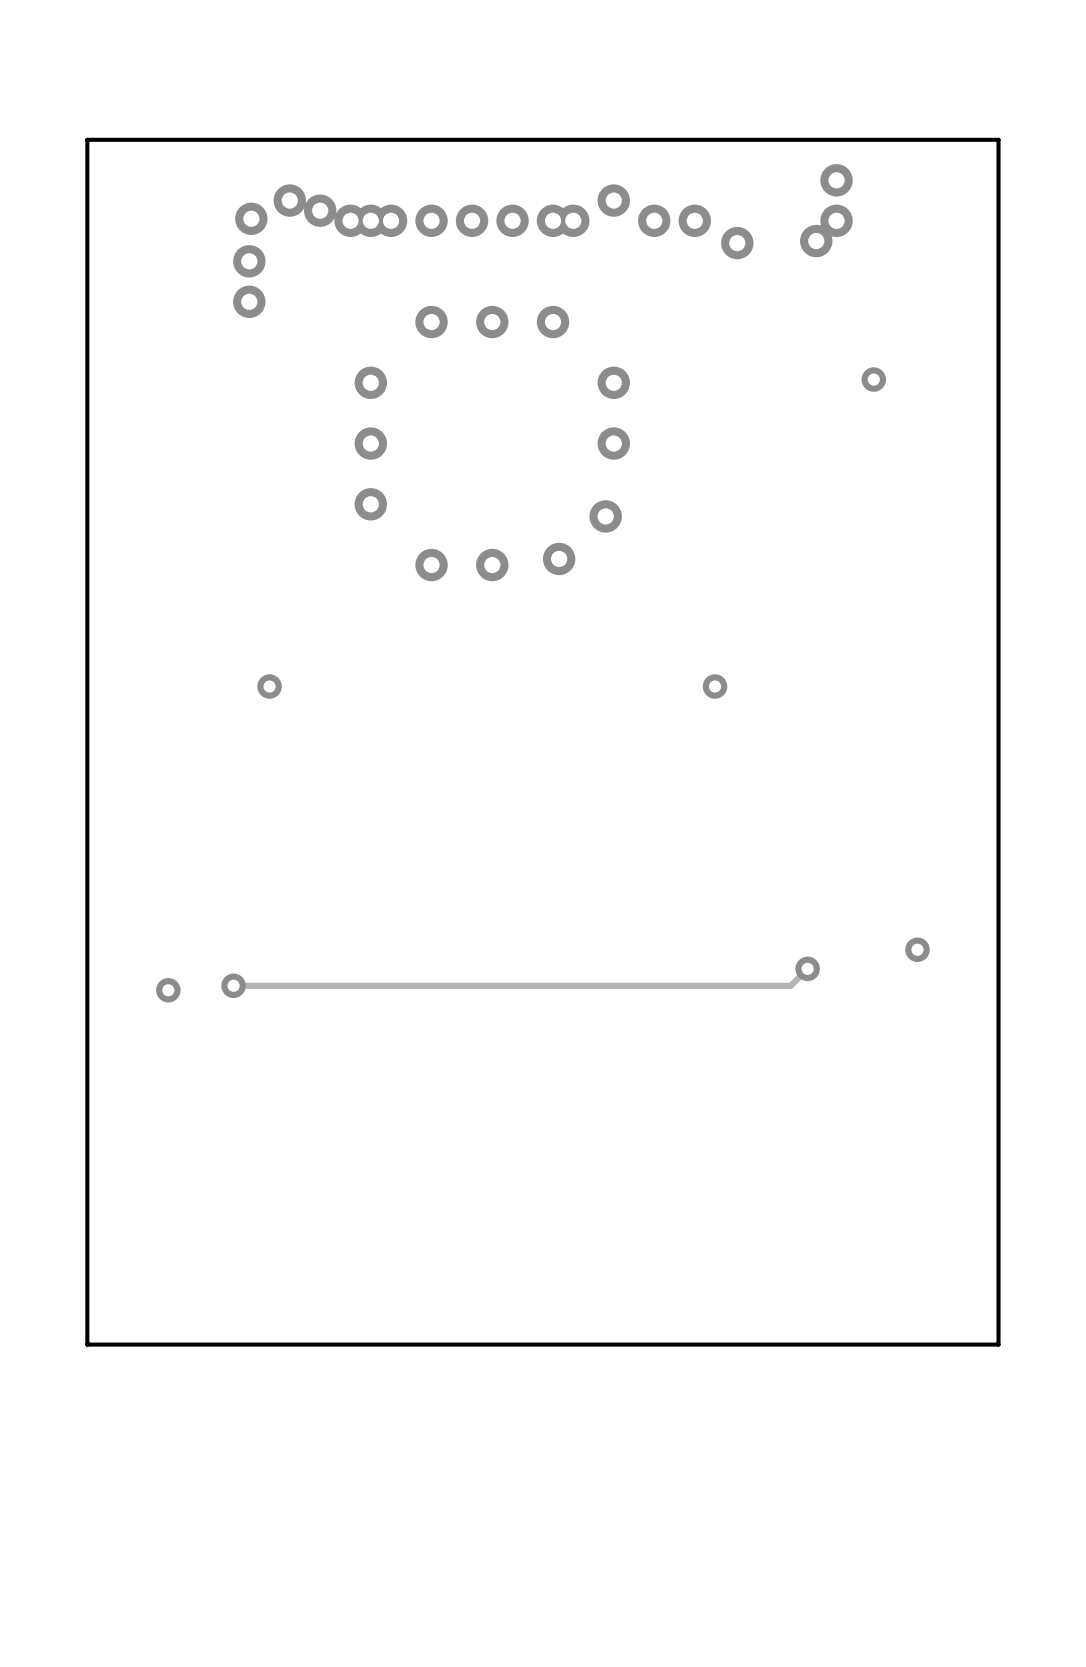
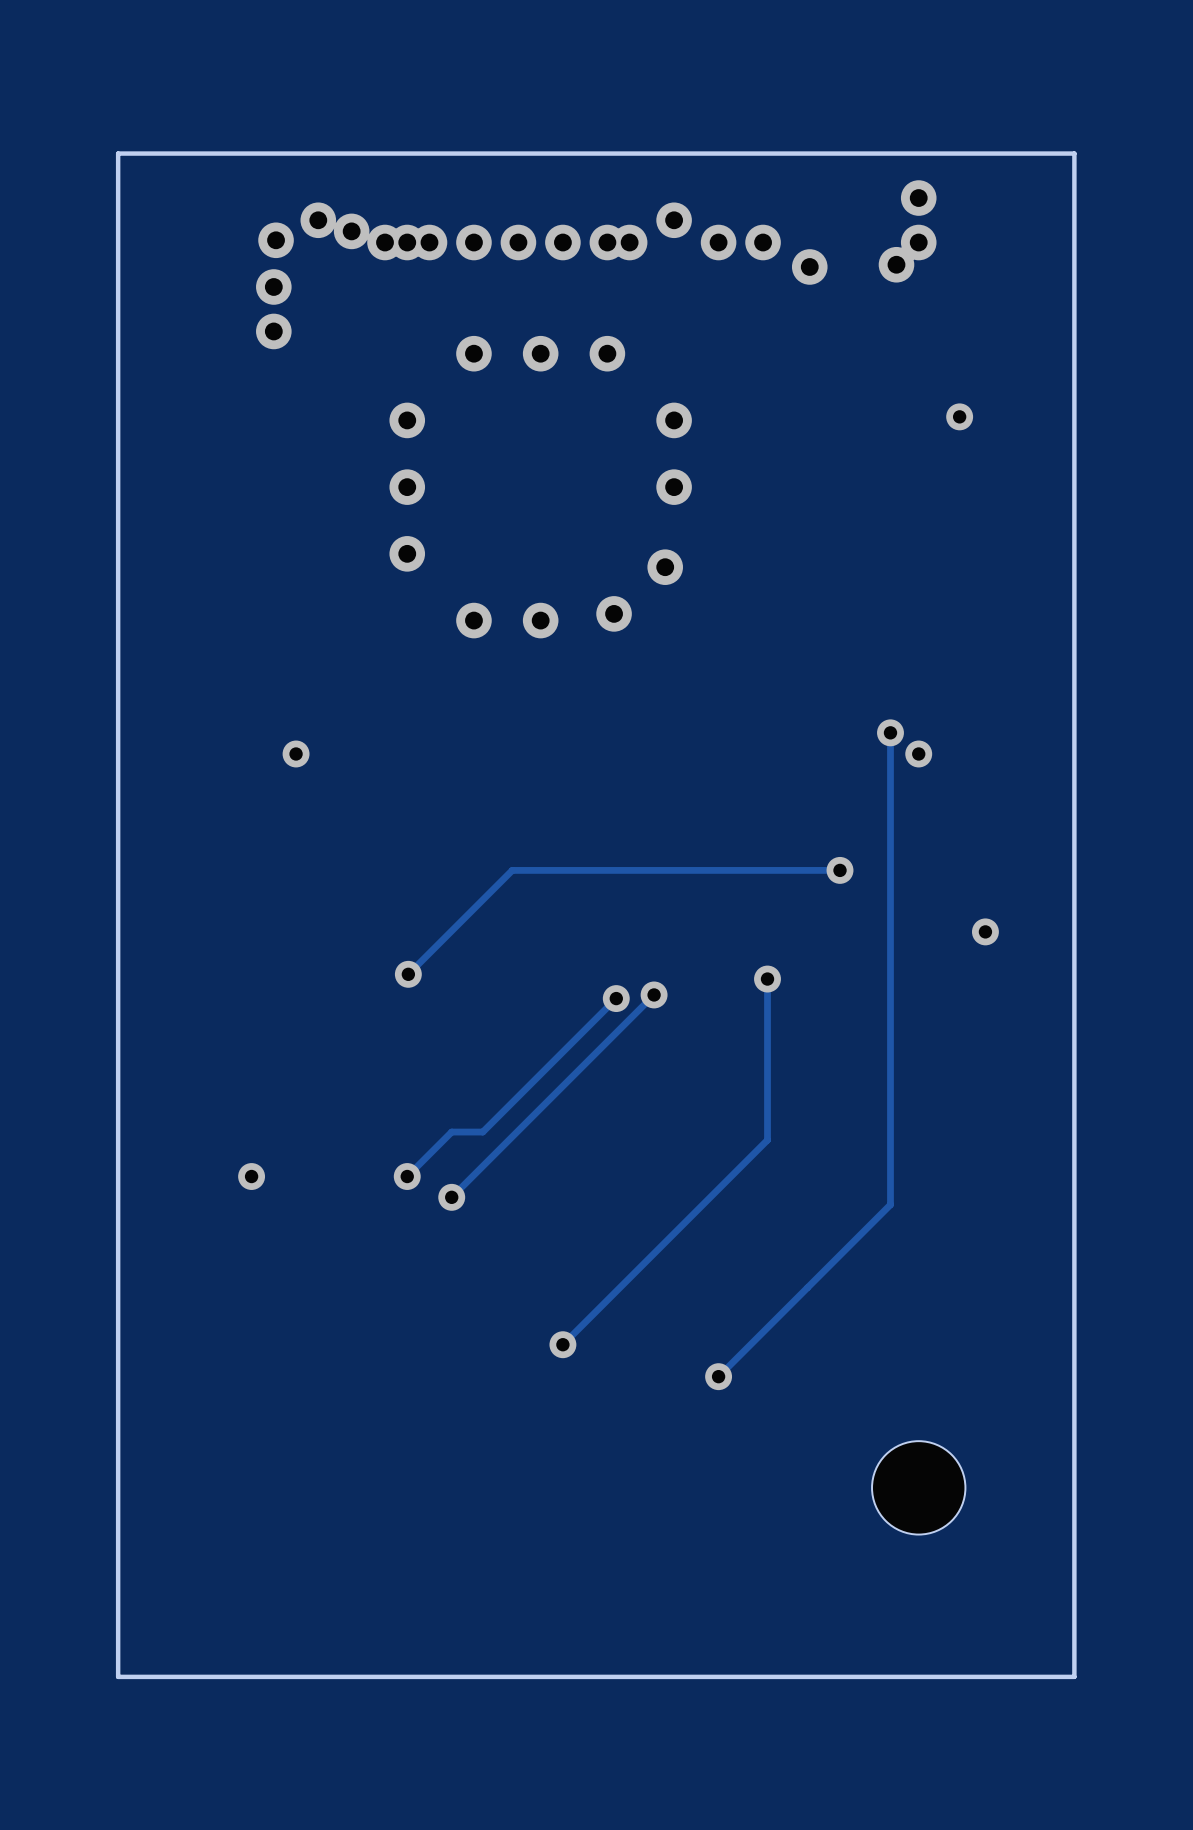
board edge: (978, 139) (998, 139) (998, 1344) (87, 1344) (87, 139) (107, 139) -> (1074, 153) (1074, 1676) (118, 1676) (118, 153)
track: none -> (890, 732) (890, 1204) (718, 1376)
via: none -> (890, 732)
via: (715, 686) -> none
via: none -> (918, 753)
track: none -> (840, 870) (512, 870) (408, 974)
via: none -> (840, 870)
via: none -> (985, 931)
via: none -> (408, 974)
track: none -> (767, 979) (767, 1140) (562, 1344)
via: none -> (767, 979)
track: none -> (654, 994) (451, 1198)
via: none -> (654, 994)
track: none -> (616, 998) (482, 1132) (451, 1132) (407, 1176)
via: none -> (616, 998)
via: (917, 949) -> none
track: (807, 968) (790, 985) (233, 985) -> none
via: (807, 968) -> none
via: (233, 985) -> none
via: (168, 990) -> none
via: none -> (251, 1176)
via: none -> (407, 1176)
via: none -> (451, 1197)
via: none -> (562, 1344)
via: none -> (718, 1376)
part: none -> (918, 1487)

